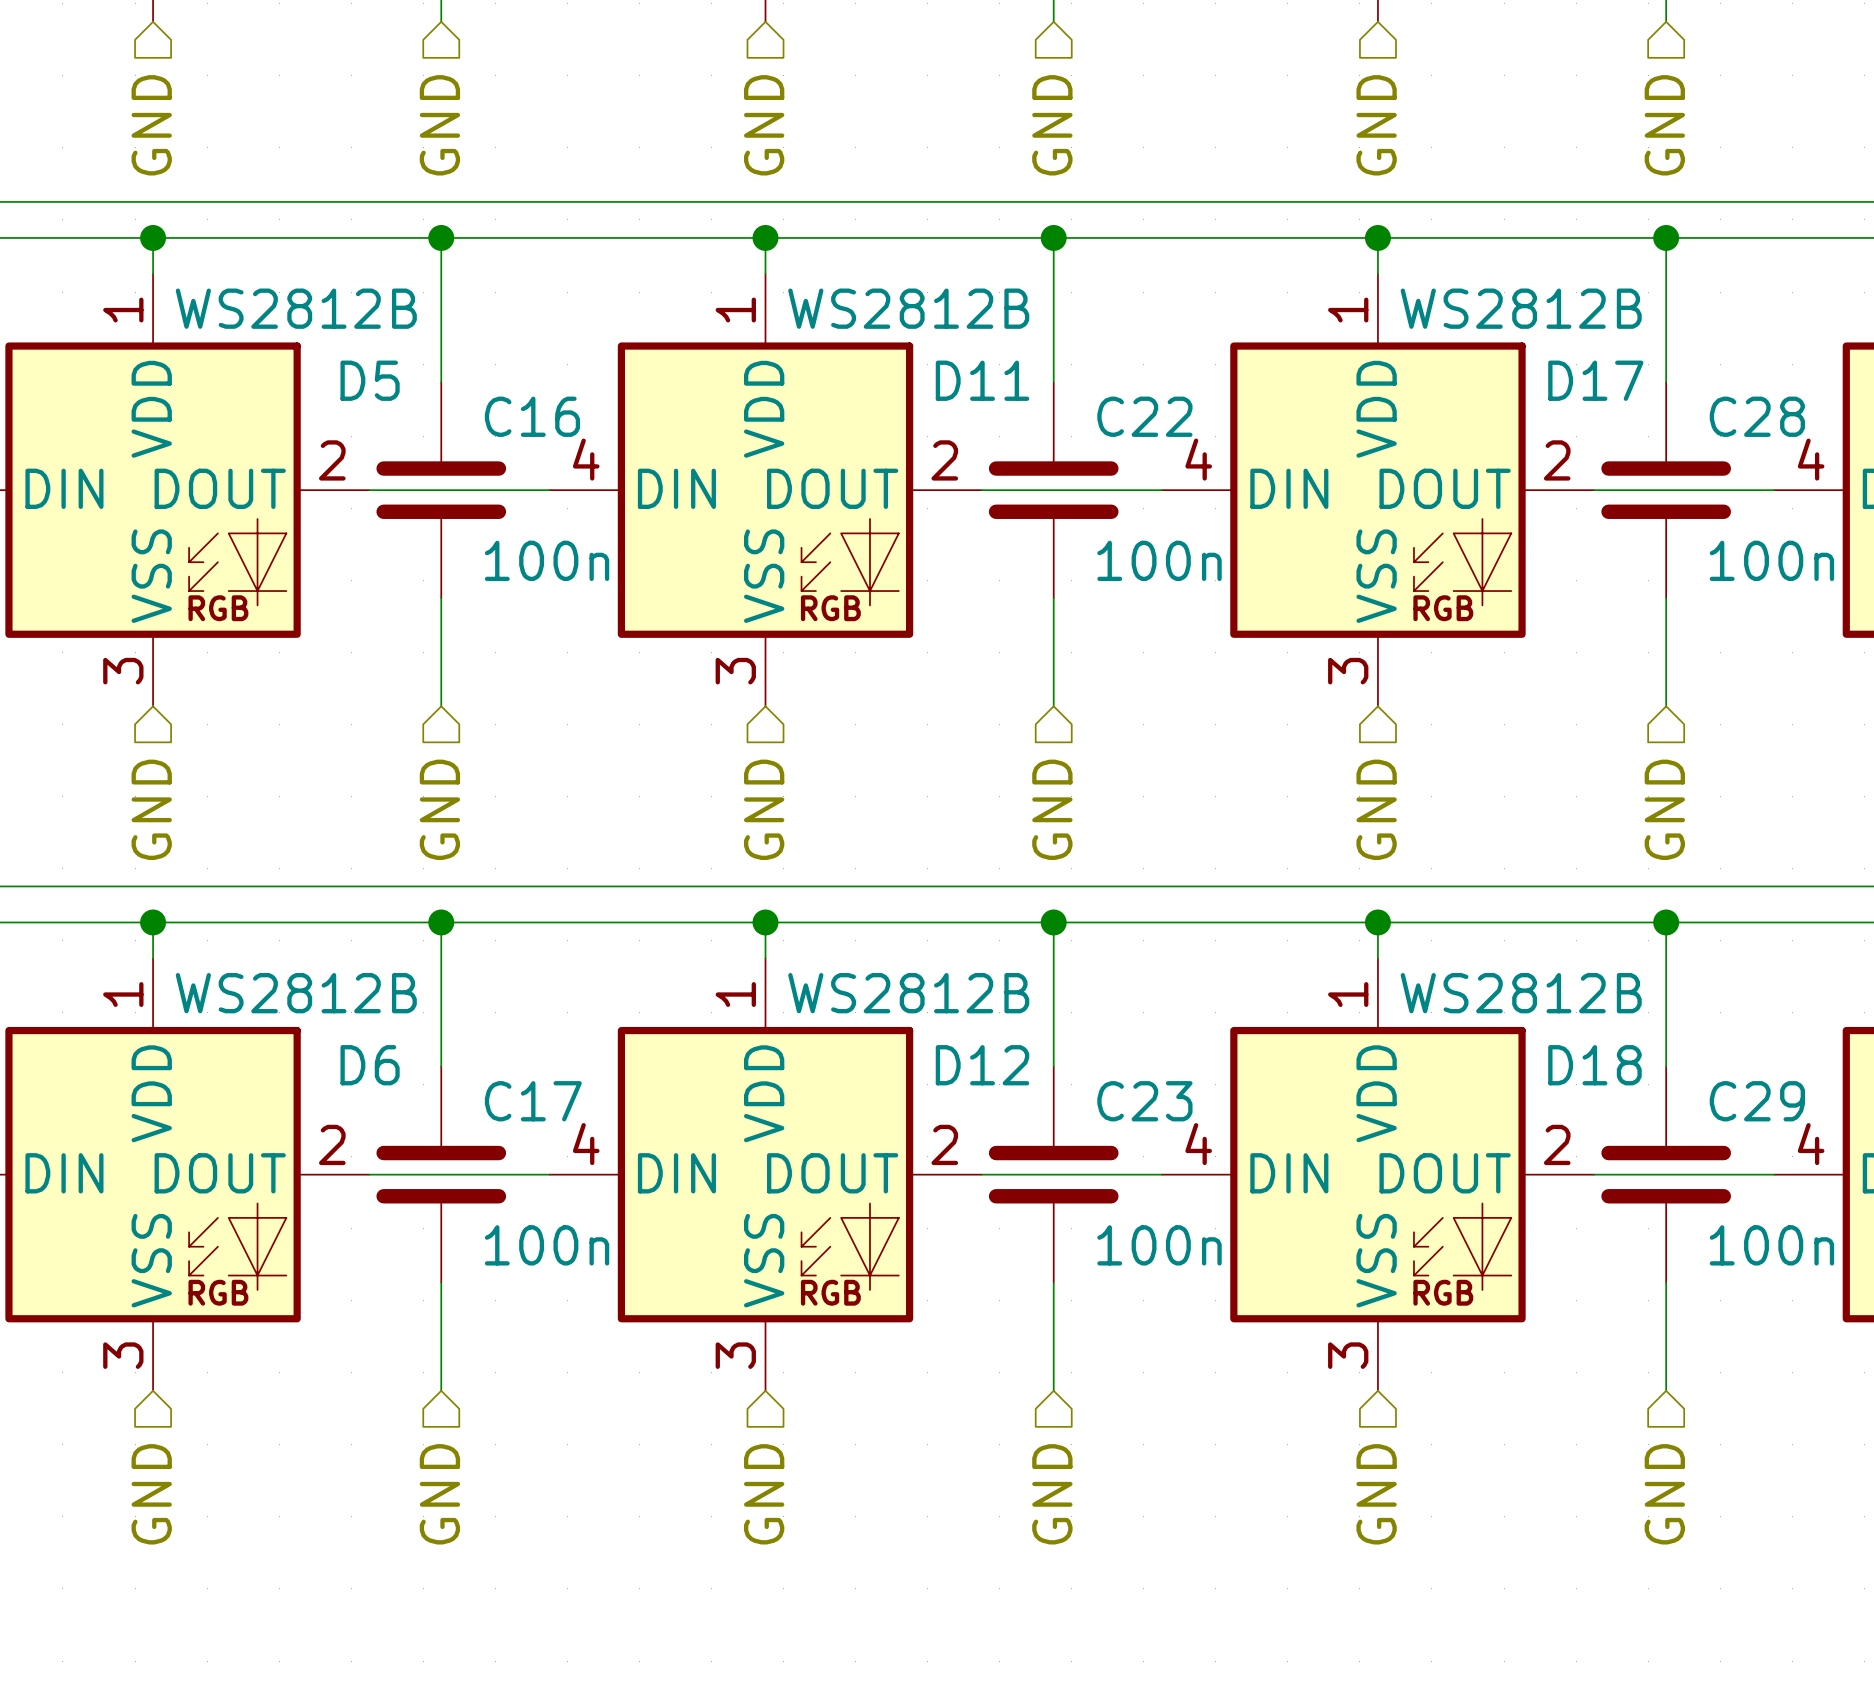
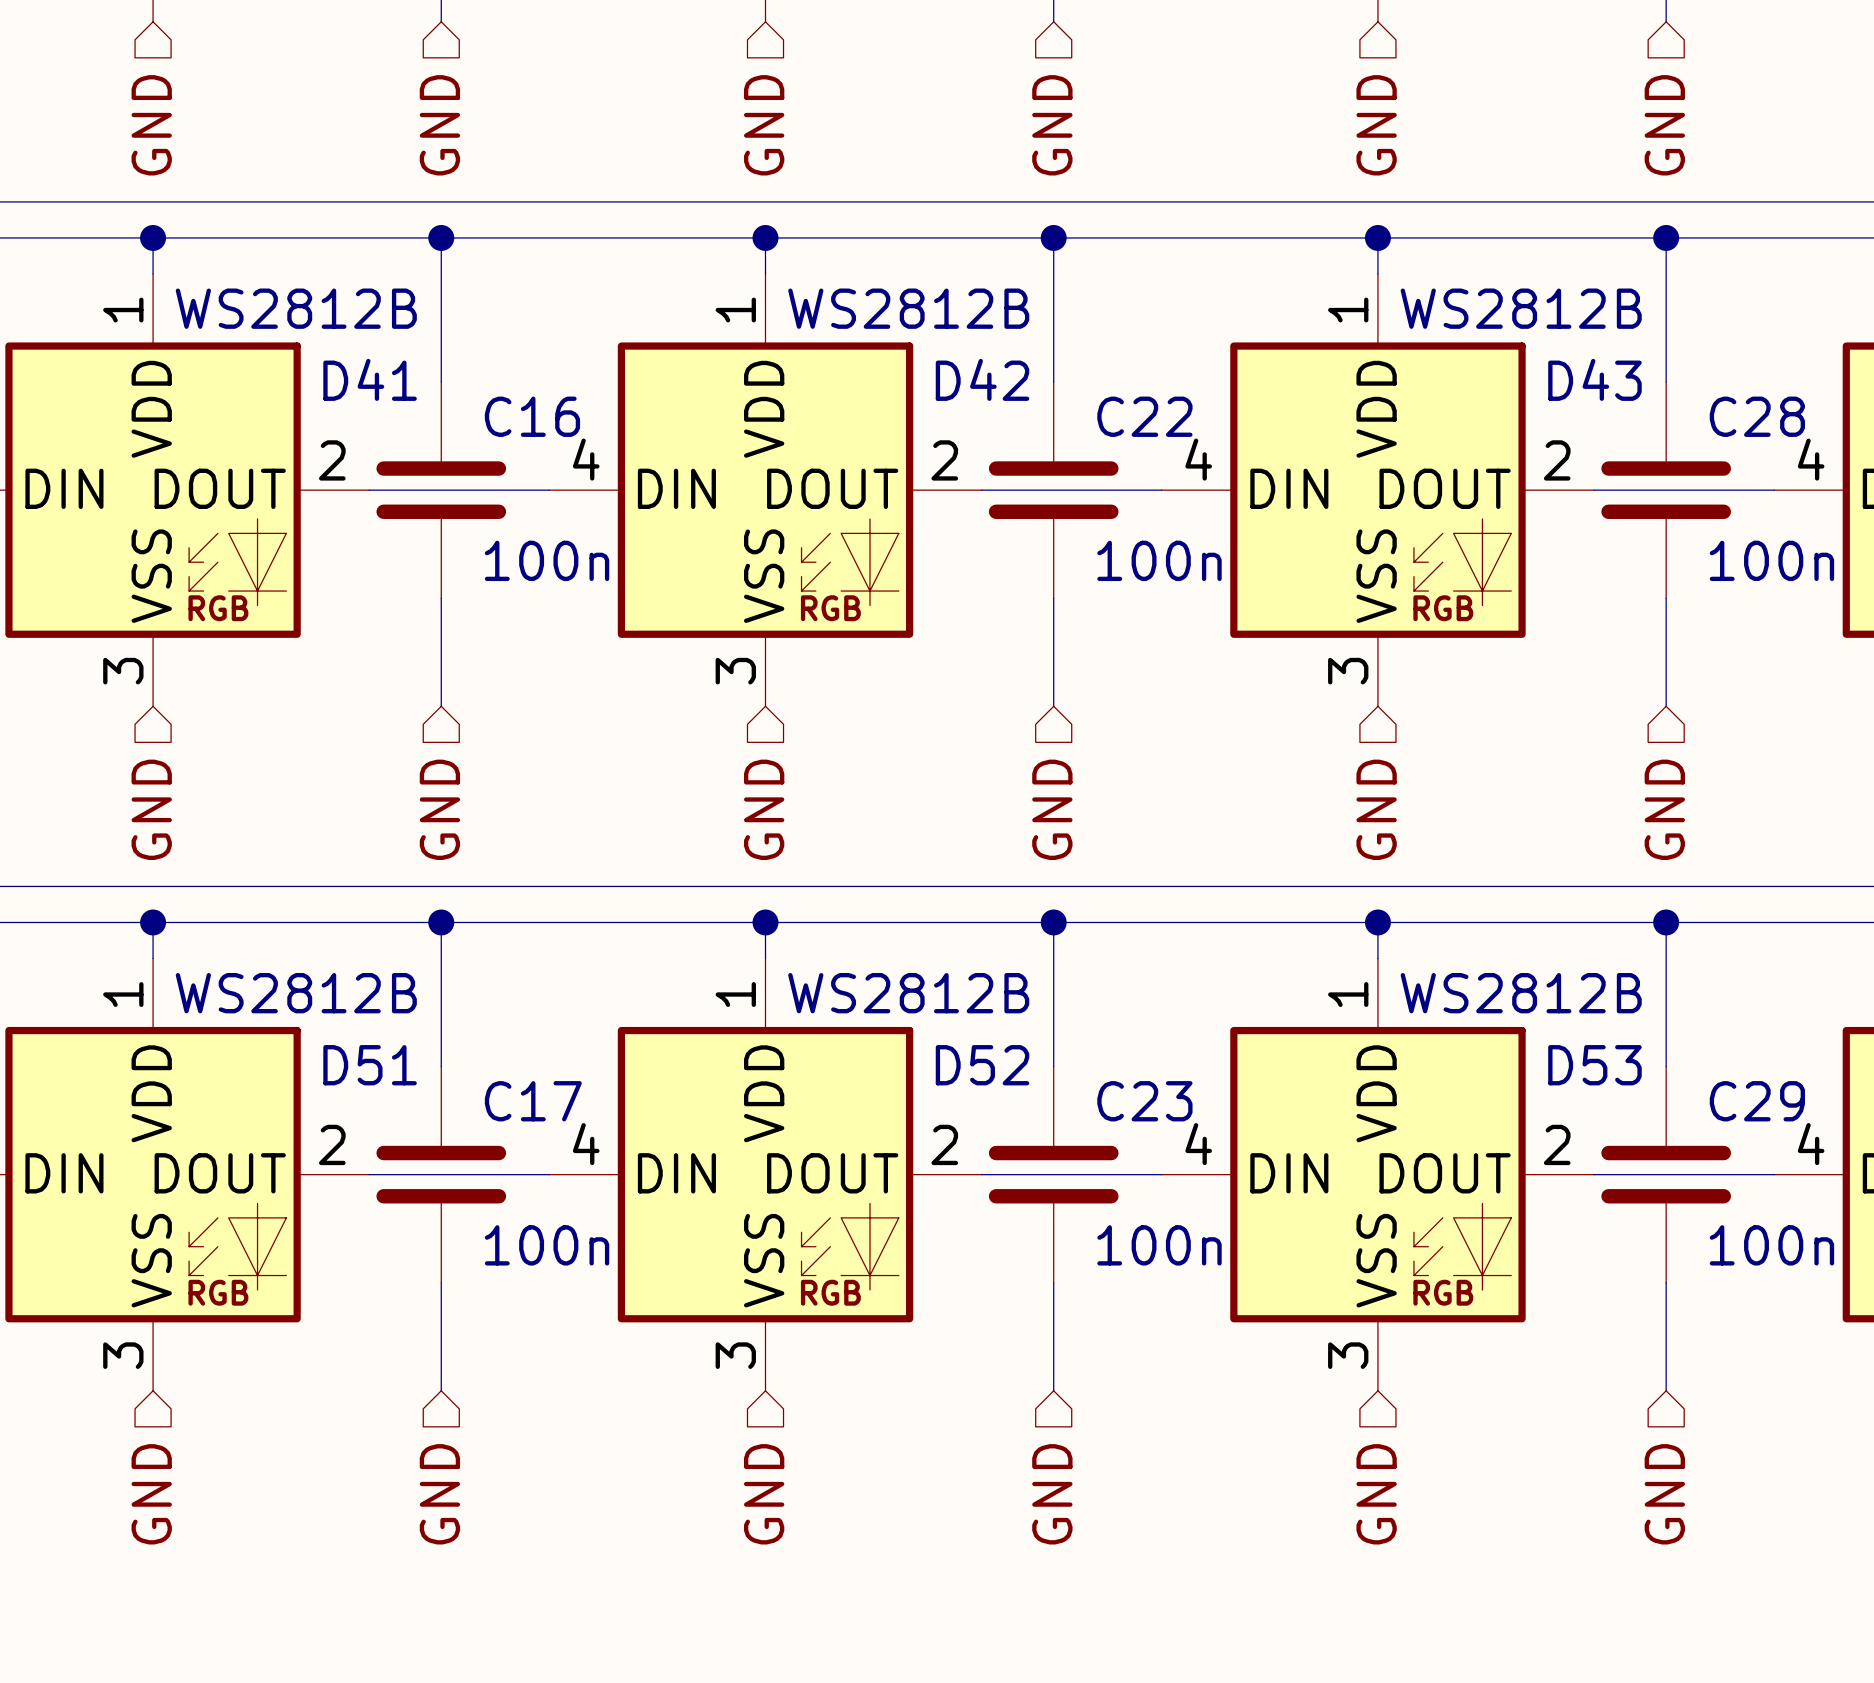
D5 name: D5 (370, 380) -> D41 (370, 379)
D11 name: D11 (982, 380) -> D42 (982, 379)
D17 name: D17 (1595, 380) -> D43 (1594, 379)
D6 name: D6 (370, 1065) -> D51 (370, 1065)
D12 name: D12 (982, 1065) -> D52 (982, 1065)
D18 name: D18 (1594, 1065) -> D53 (1594, 1065)

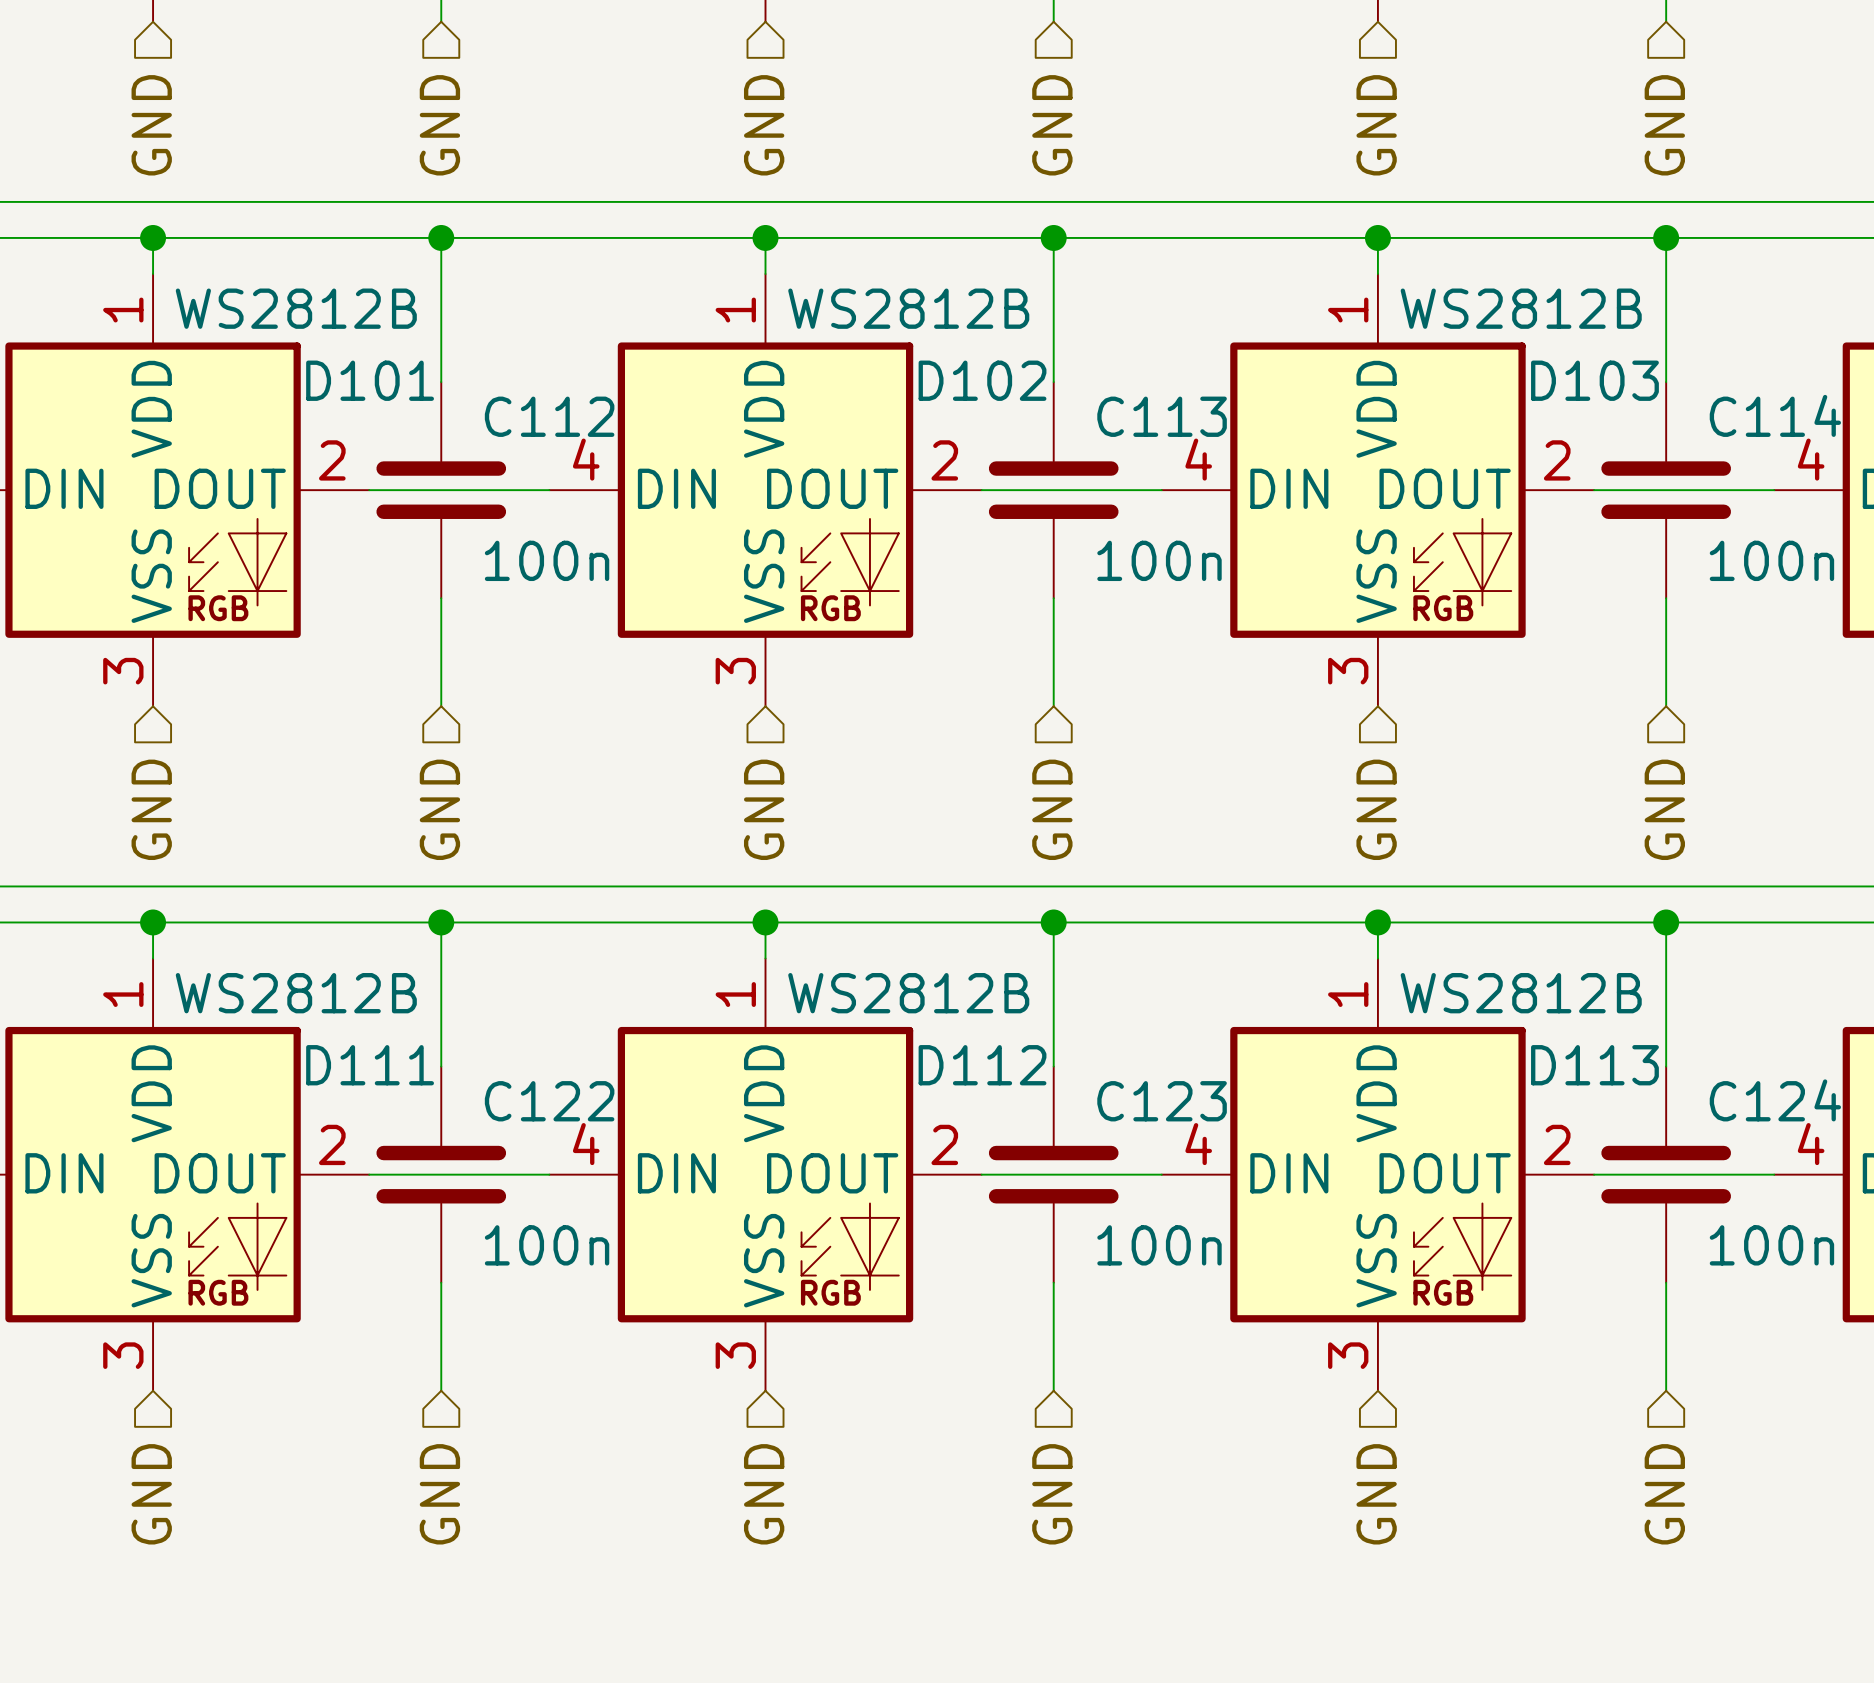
D41 name: D41 (370, 379) -> D101 (370, 380)
D42 name: D42 (982, 379) -> D102 (982, 380)
D43 name: D43 (1594, 379) -> D103 (1594, 380)
C16 name: C16 (532, 416) -> C112 (549, 416)
C22 name: C22 (1144, 416) -> C113 (1162, 416)
C28 name: C28 (1757, 416) -> C114 (1775, 415)
D51 name: D51 (370, 1065) -> D111 (370, 1065)
D52 name: D52 (982, 1065) -> D112 (982, 1065)
D53 name: D53 (1594, 1065) -> D113 (1594, 1065)
C17 name: C17 (533, 1101) -> C122 (549, 1101)
C23 name: C23 (1144, 1101) -> C123 (1162, 1101)
C29 name: C29 (1757, 1101) -> C124 (1775, 1100)

